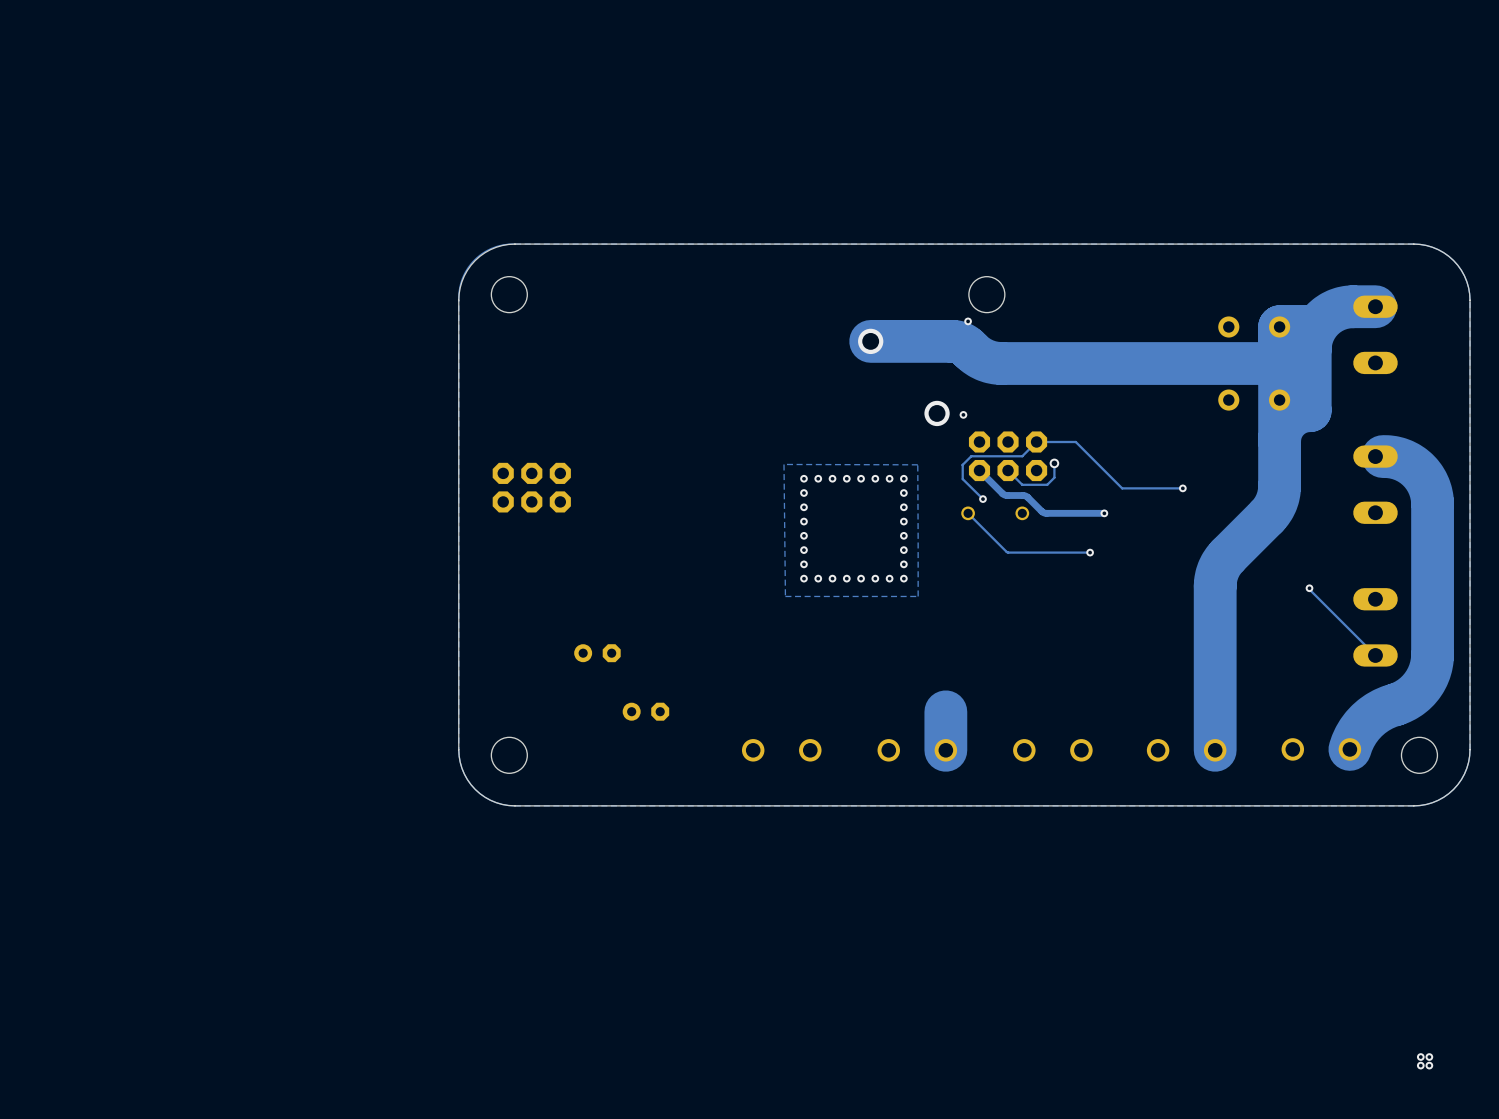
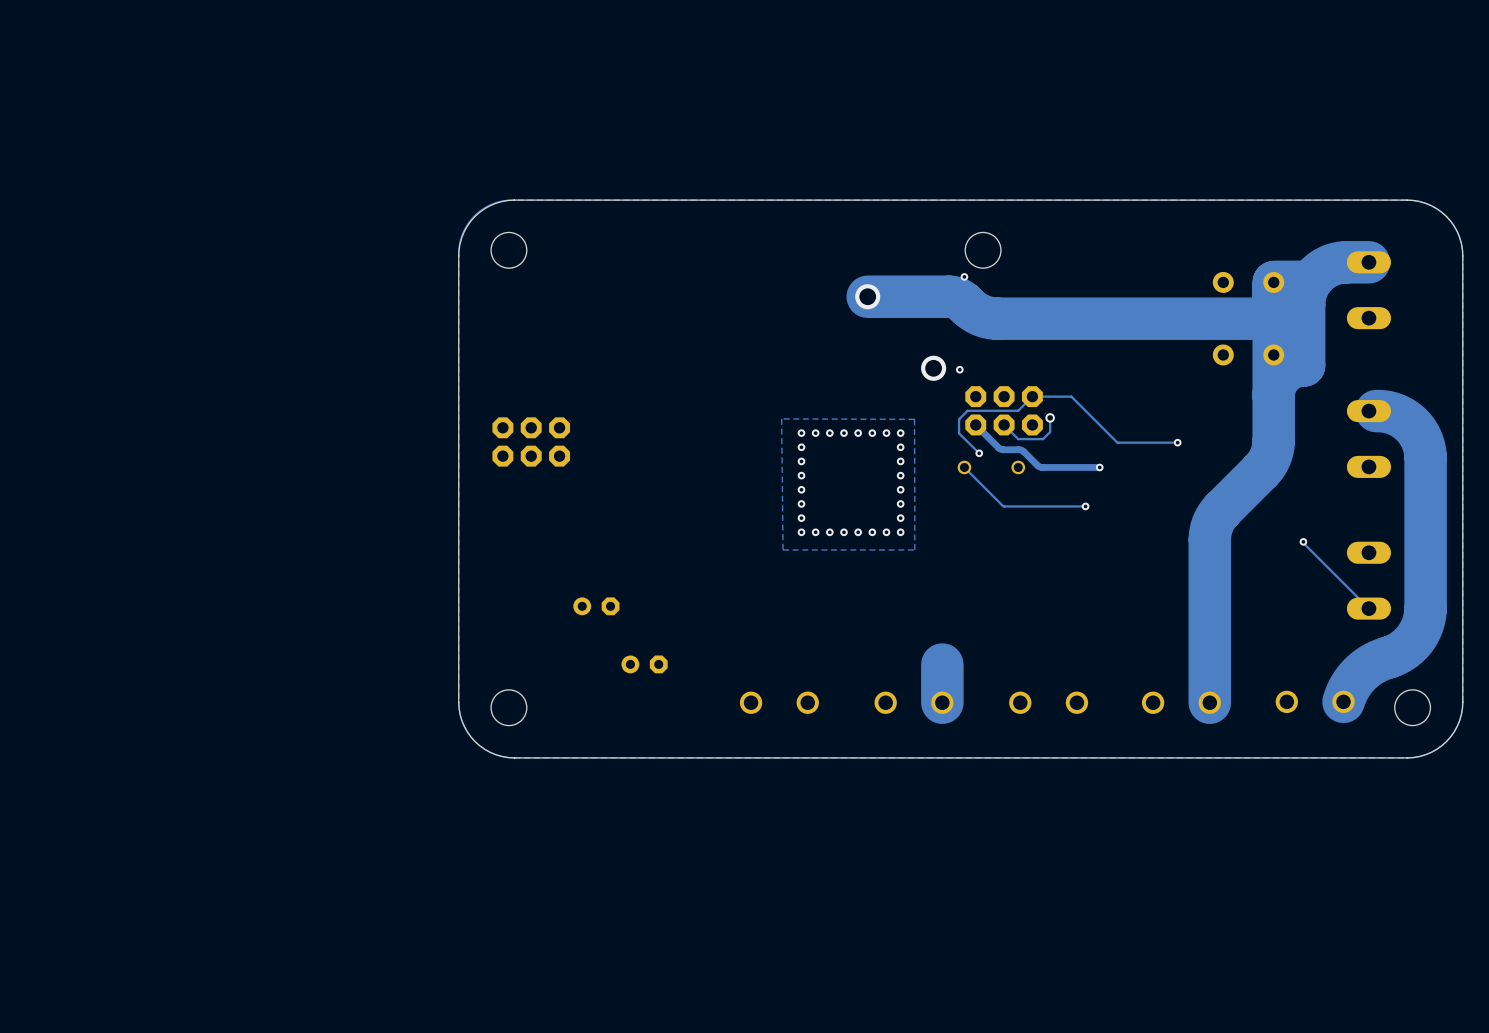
via: (1420, 1057) -> none
via: (1429, 1057) -> none
via: (1420, 1065) -> none
via: (1429, 1065) -> none

